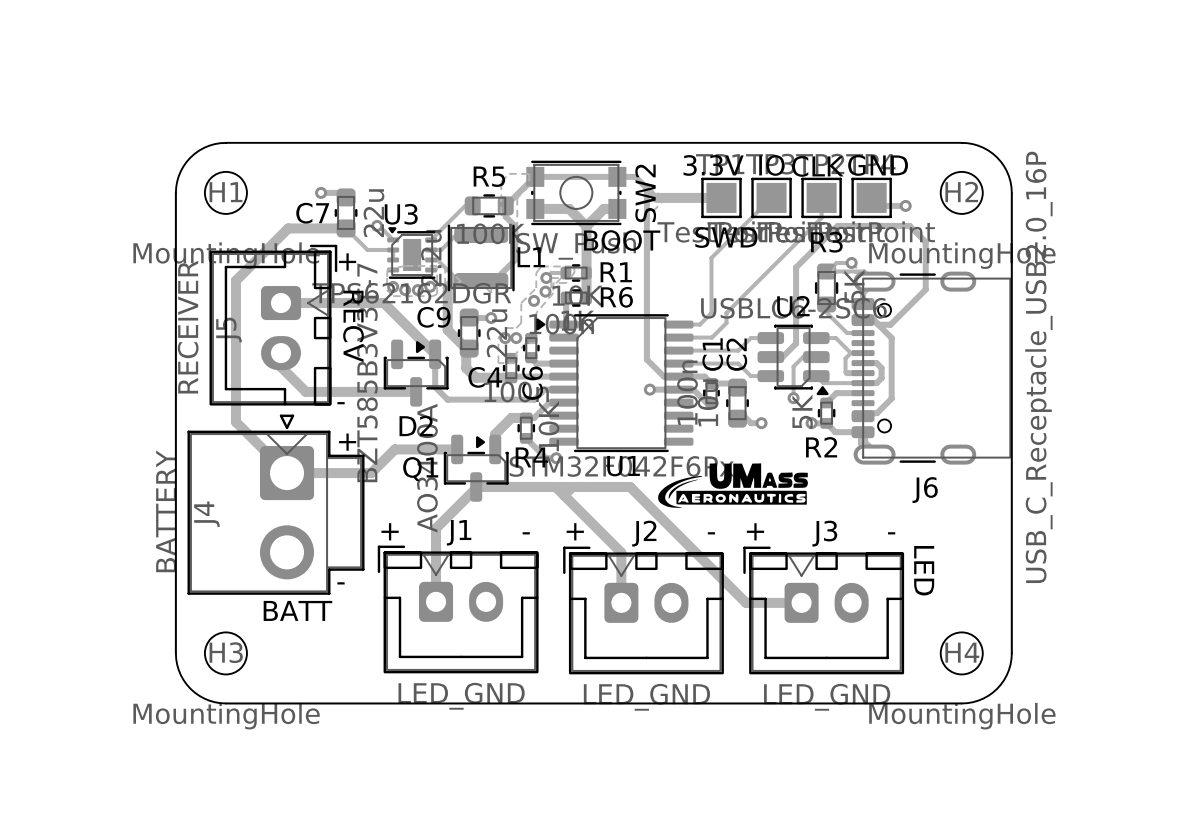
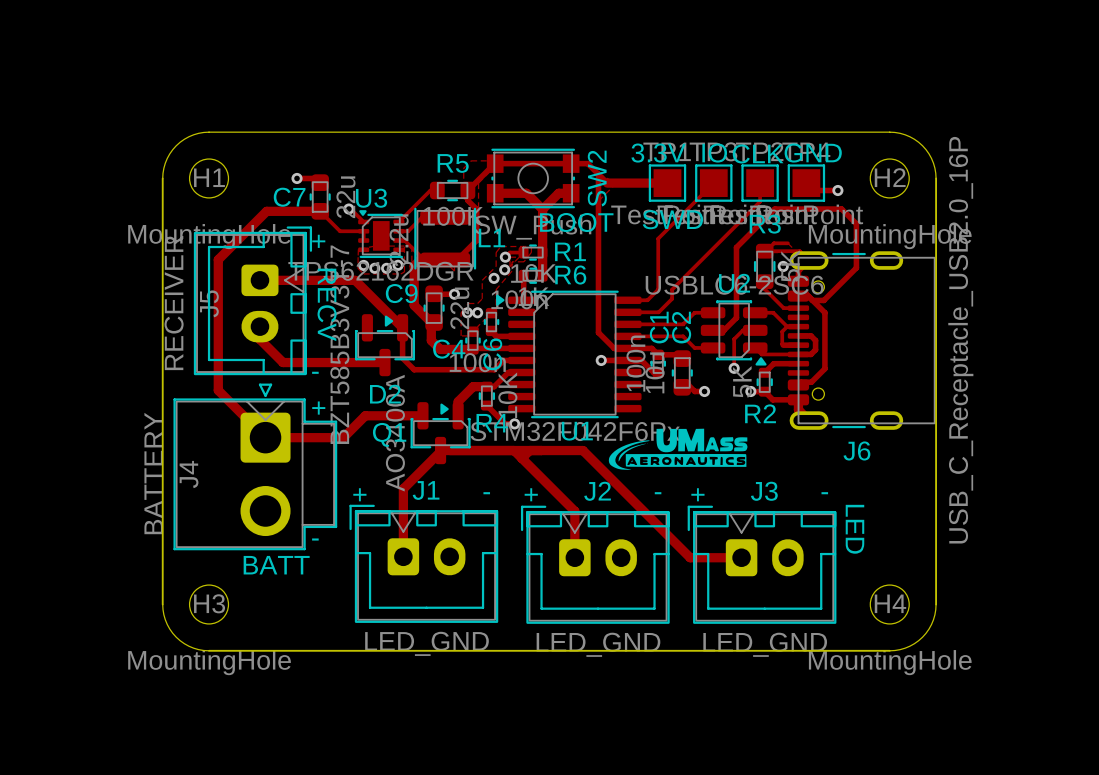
via position: (851, 262) -> (783, 266)

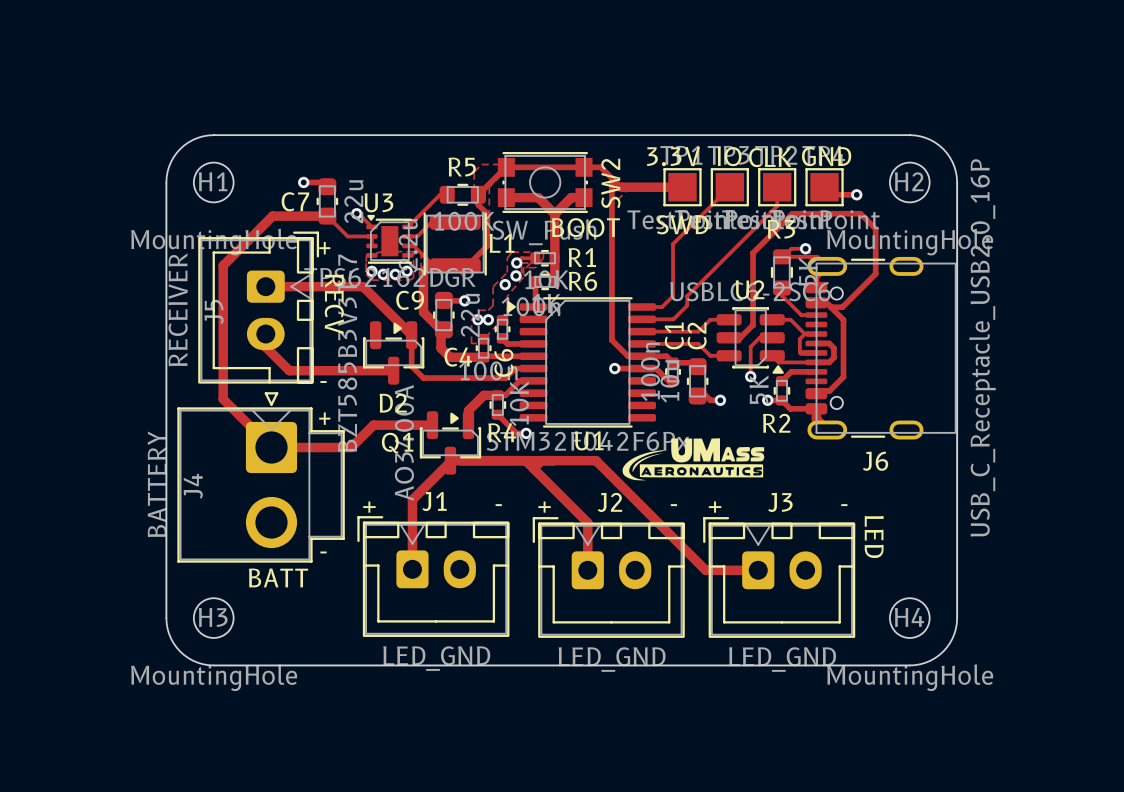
via position: (783, 266) -> (805, 248)

